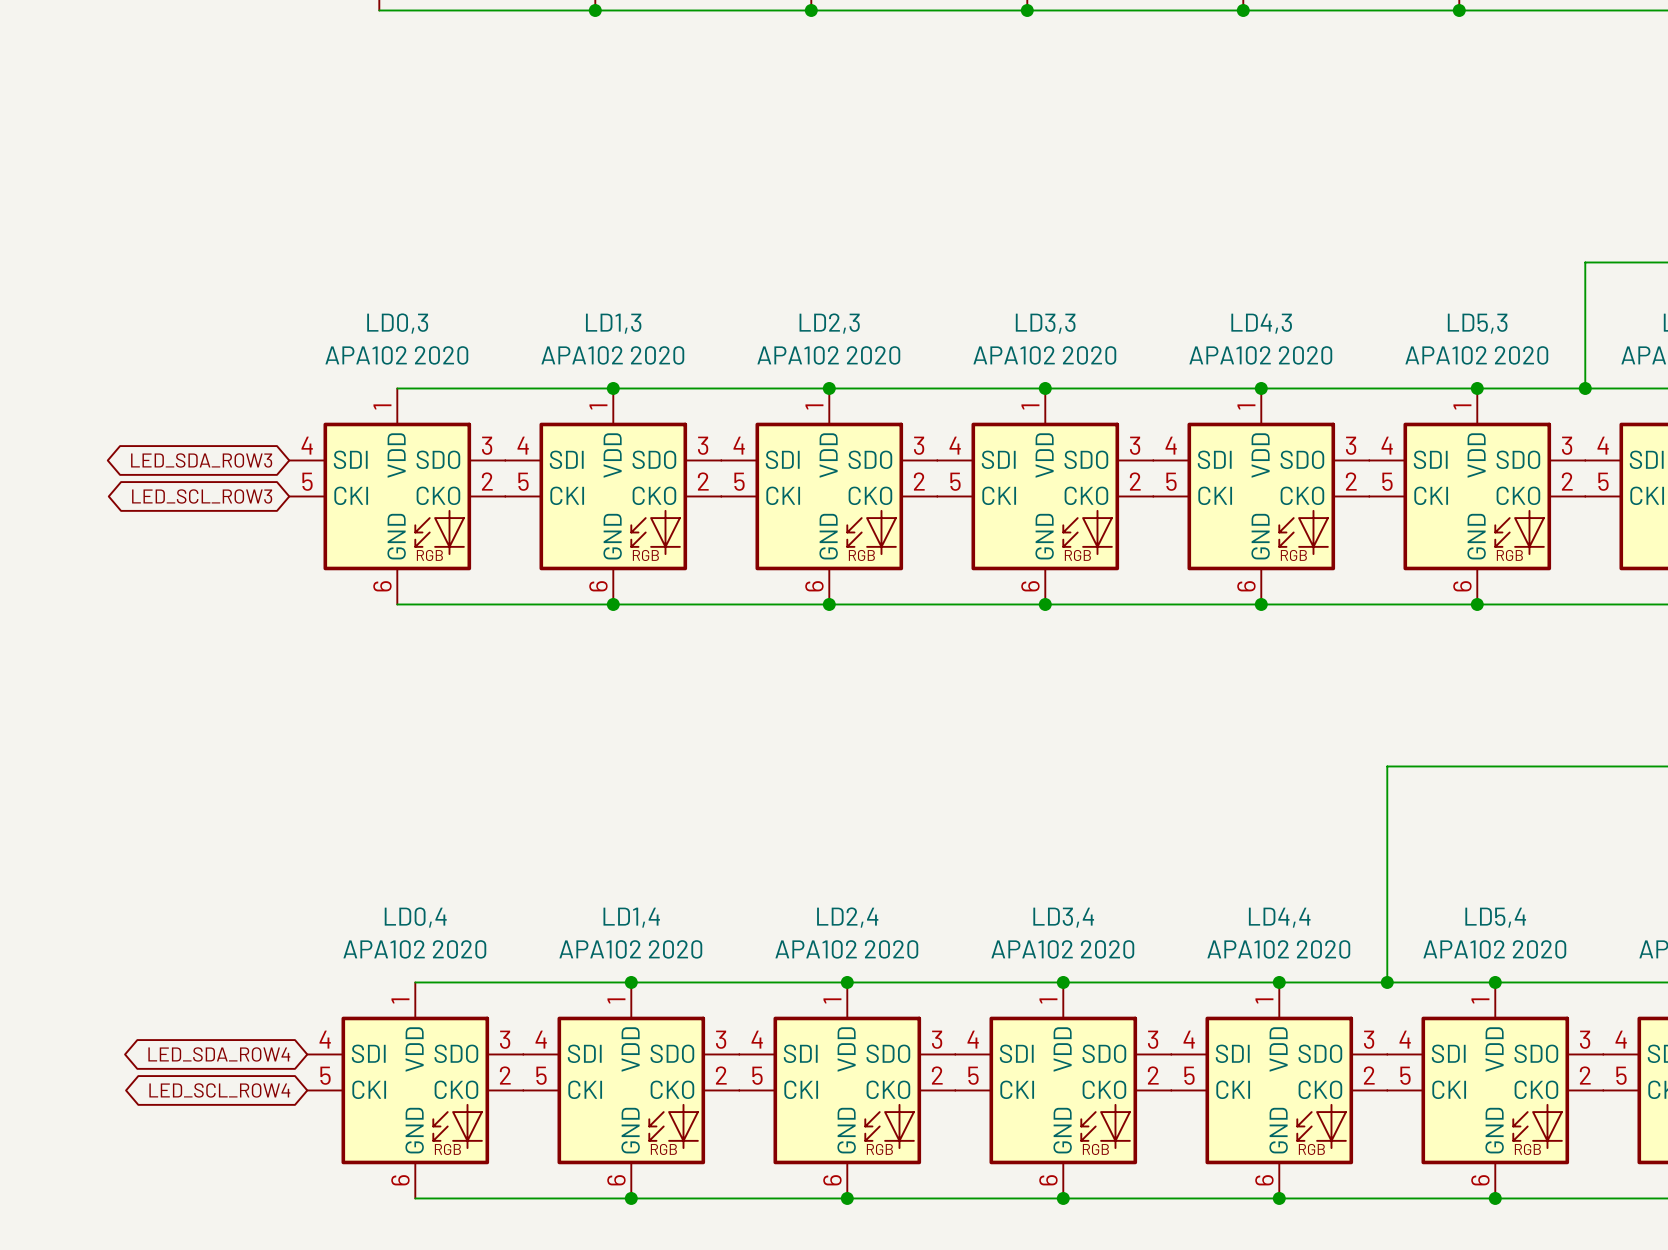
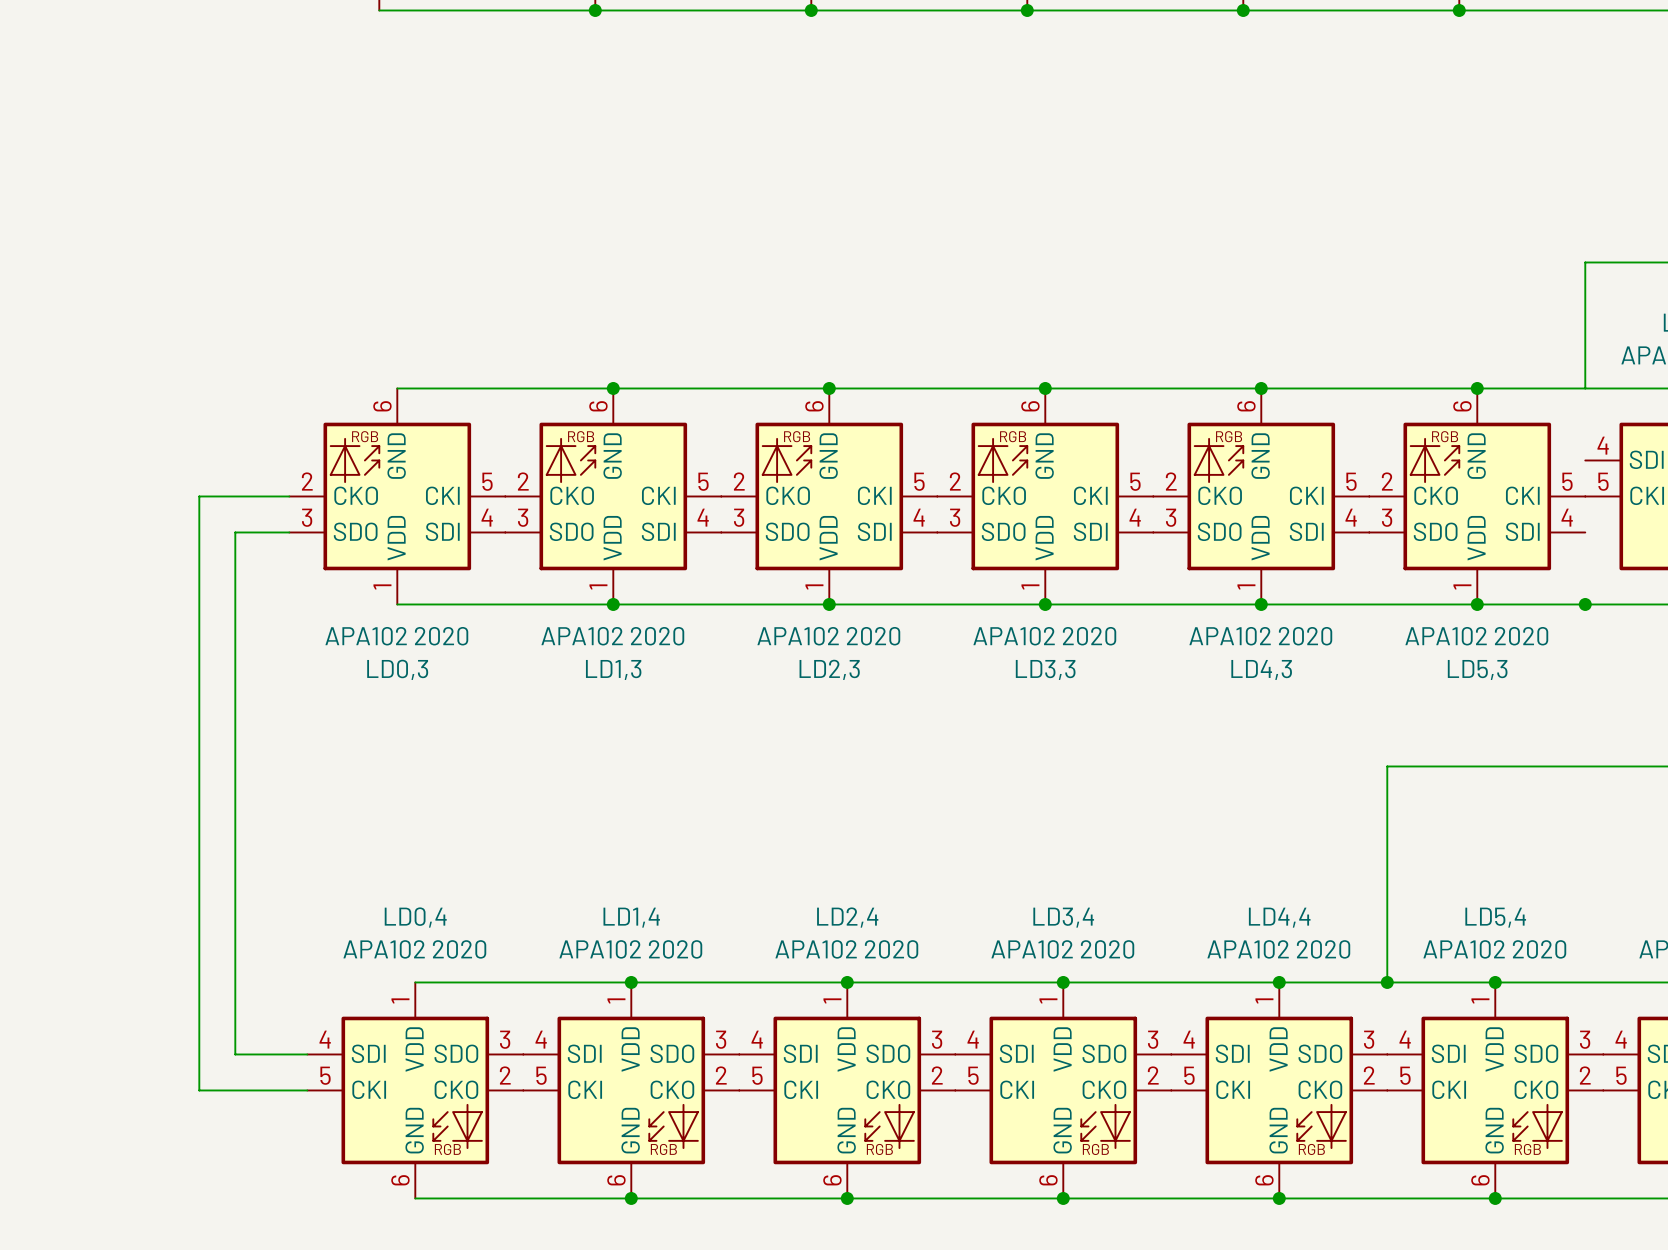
junction: (1585, 388) -> none
global label: LED_SDA_ROW3 (201, 460) -> none
global label: LED_SCL_ROW3 (202, 496) -> none
wire: none -> (289, 496) (199, 496) (199, 1090) (307, 1090)
LD0,3 rotation: 0° (397, 496) -> 180° (397, 496)
LD1,3 rotation: 0° (613, 496) -> 180° (613, 496)
LD2,3 rotation: 0° (829, 496) -> 180° (829, 496)
LD3,3 rotation: 0° (1045, 496) -> 180° (1045, 496)
LD4,3 rotation: 0° (1261, 496) -> 180° (1261, 496)
LD5,3 rotation: 0° (1477, 496) -> 180° (1477, 496)
wire: none -> (289, 532) (235, 532) (235, 1054) (307, 1054)
junction: none -> (1585, 604)
global label: LED_SDA_ROW4 (219, 1054) -> none
global label: LED_SCL_ROW4 (219, 1090) -> none

